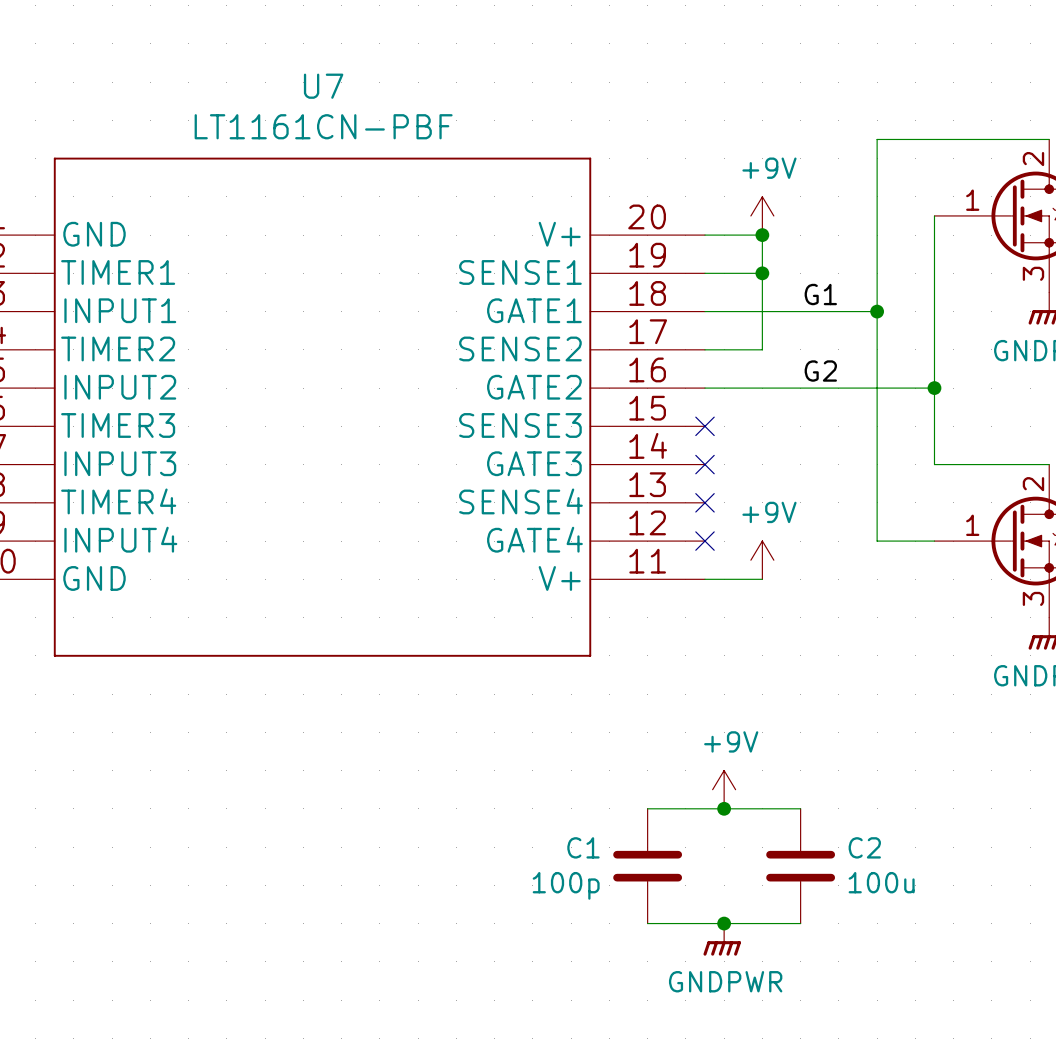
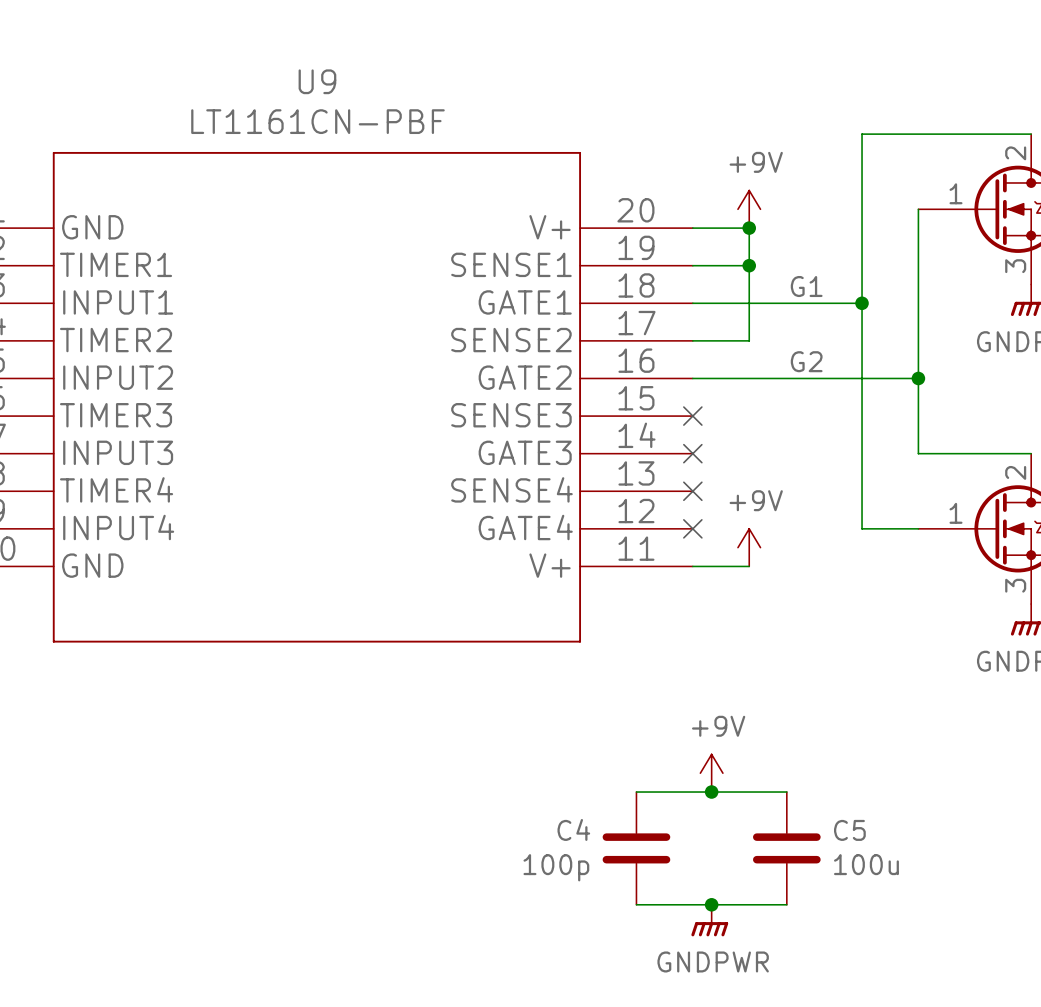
U7 name: U7 (323, 86) -> U9 (317, 81)
C1 name: C1 (583, 847) -> C4 (573, 829)
C2 name: C2 (864, 847) -> C5 (849, 830)

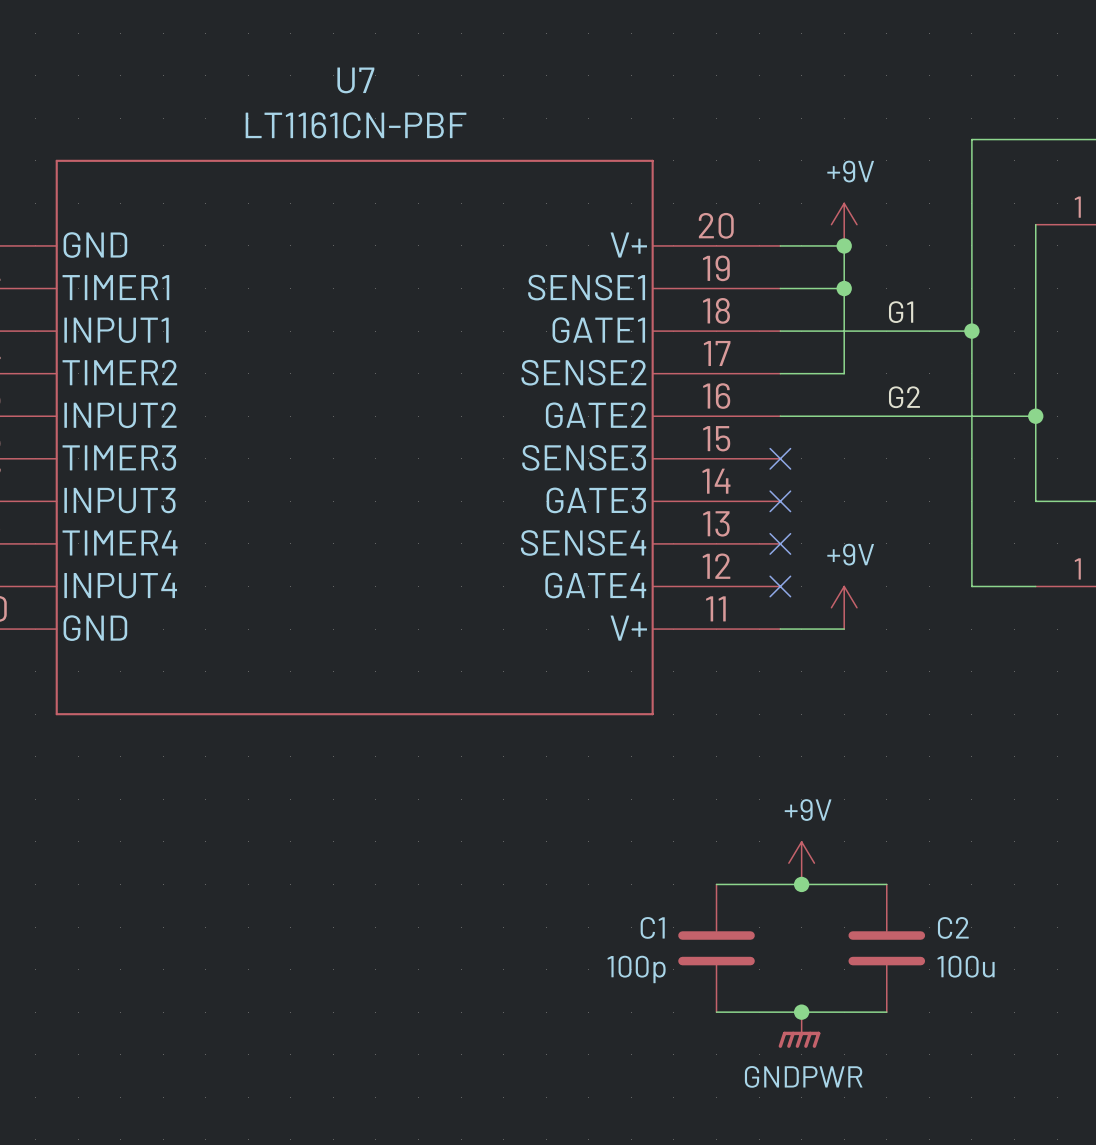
U9 name: U9 (317, 81) -> U7 (355, 80)
C4 name: C4 (573, 829) -> C1 (652, 927)
C5 name: C5 (849, 830) -> C2 (953, 927)

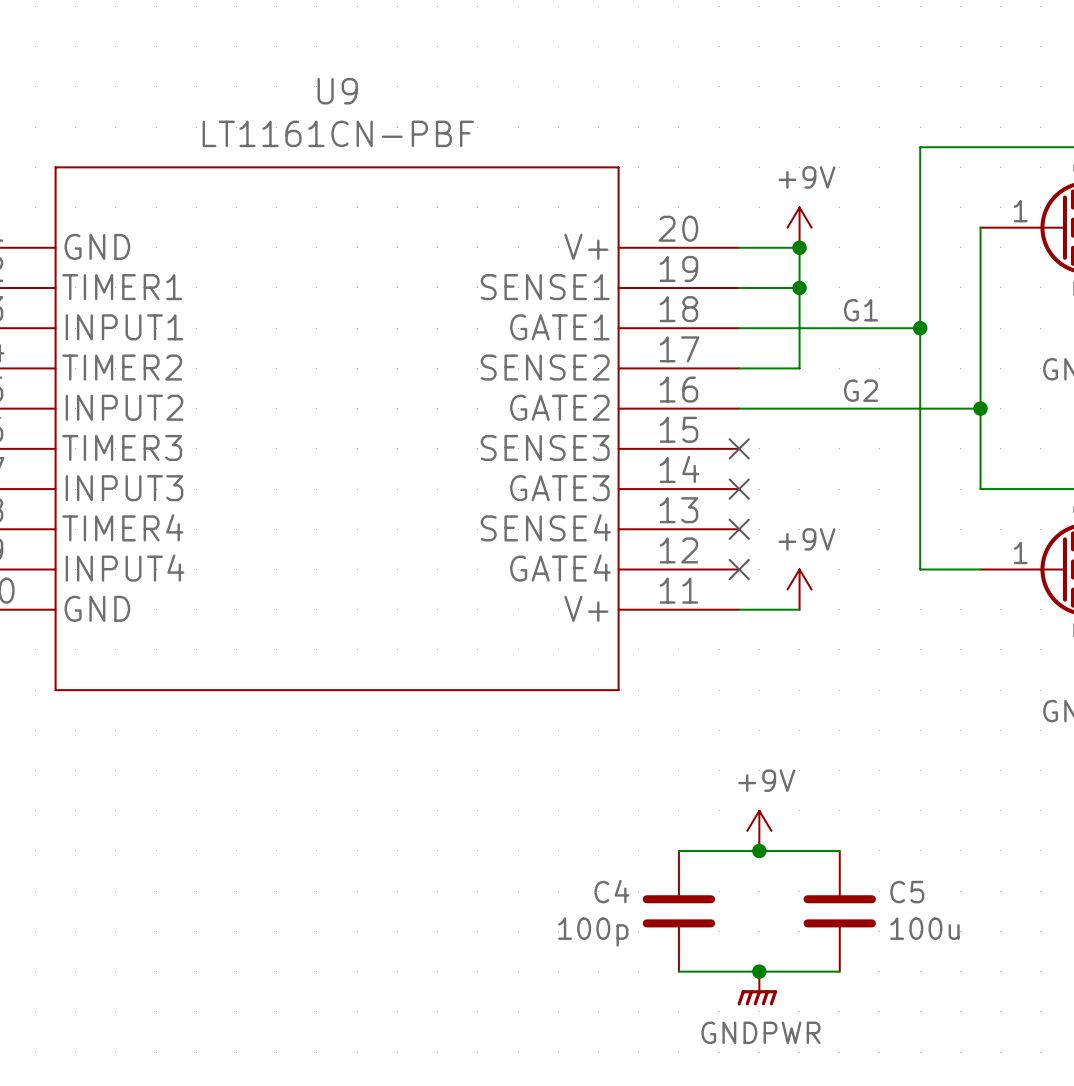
U7 name: U7 (355, 80) -> U9 (337, 91)
C1 name: C1 (652, 927) -> C4 (611, 891)
C2 name: C2 (953, 927) -> C5 (907, 892)

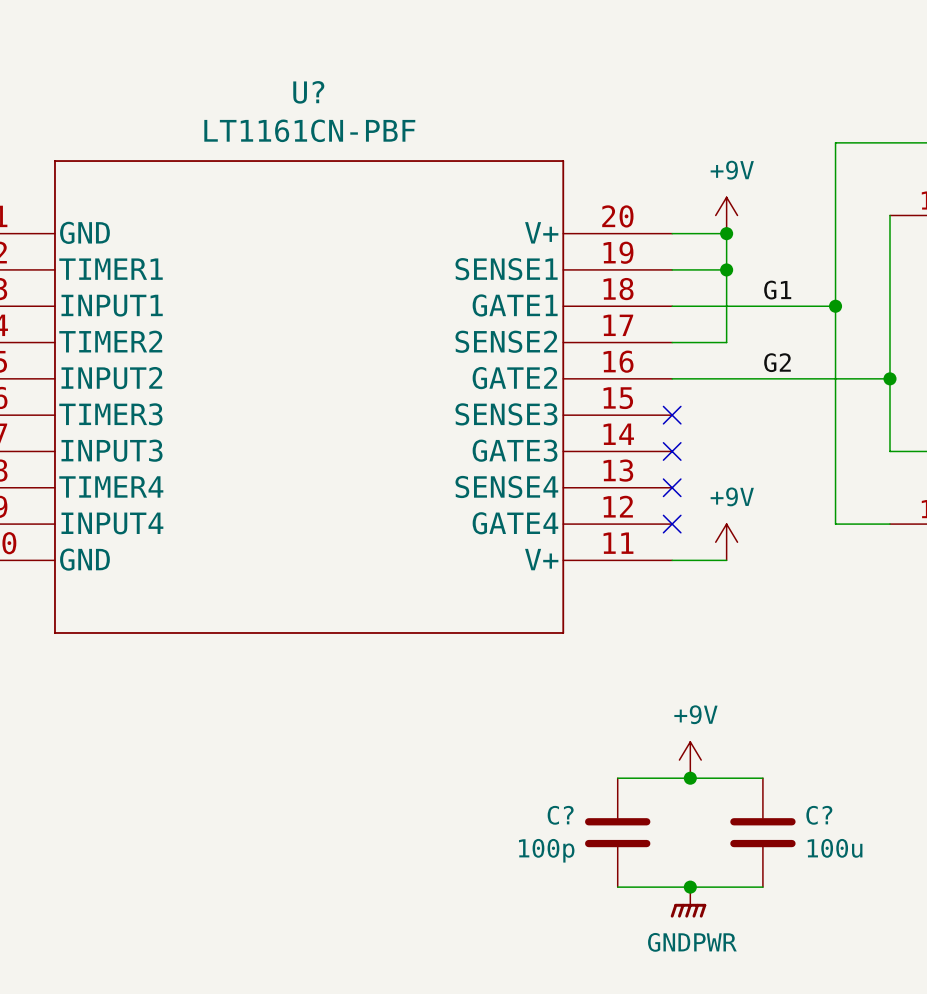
U9 name: U9 (337, 91) -> U? (308, 92)
C4 name: C4 (611, 891) -> C? (560, 815)
C5 name: C5 (907, 892) -> C? (819, 815)

